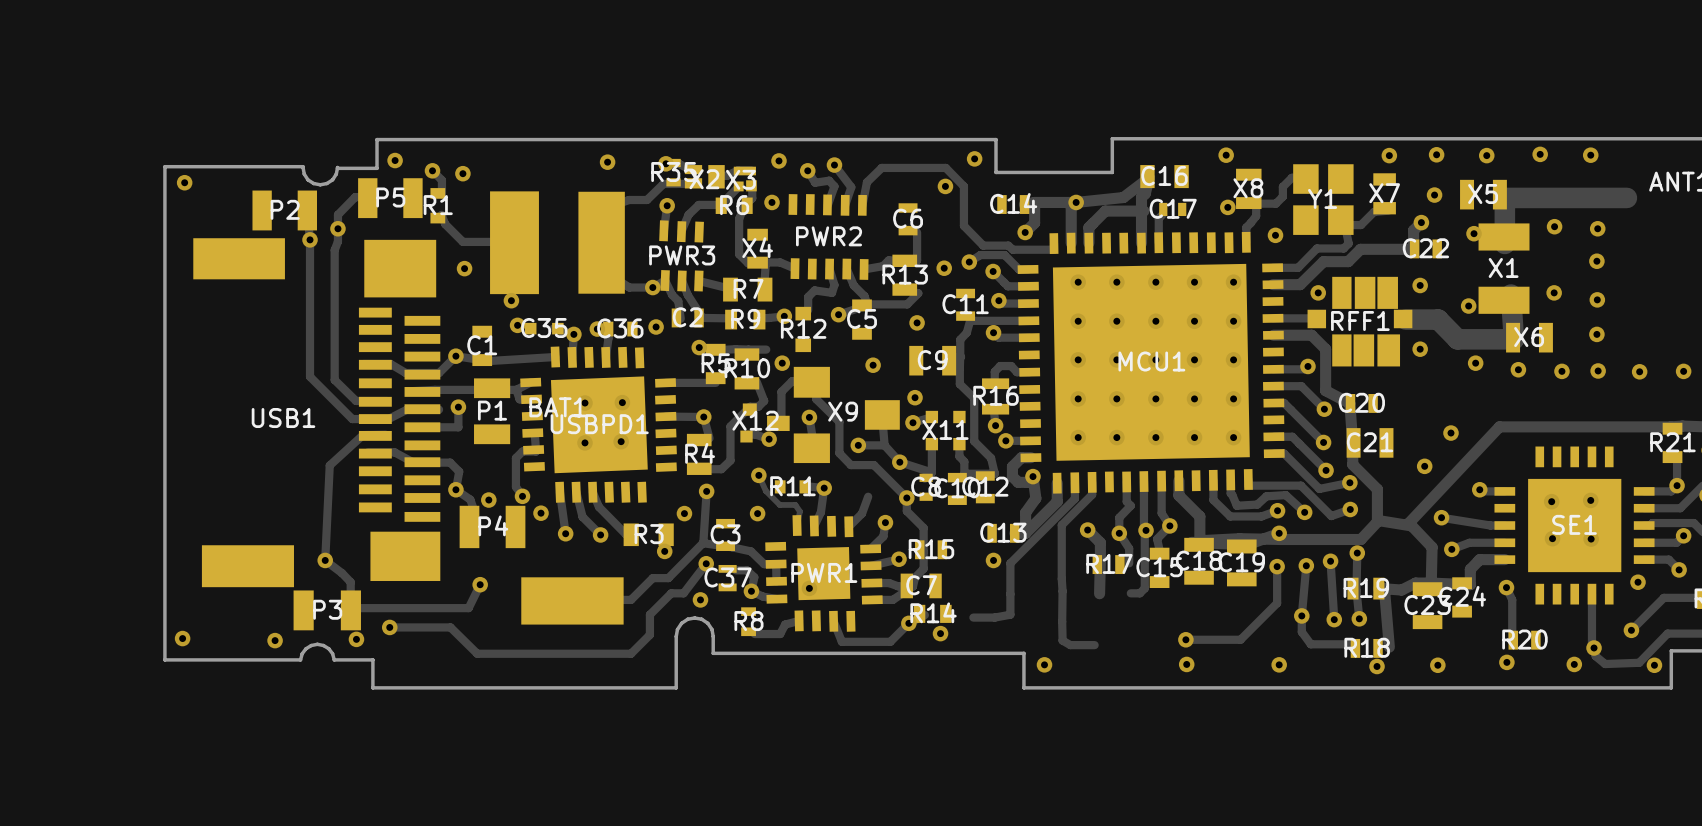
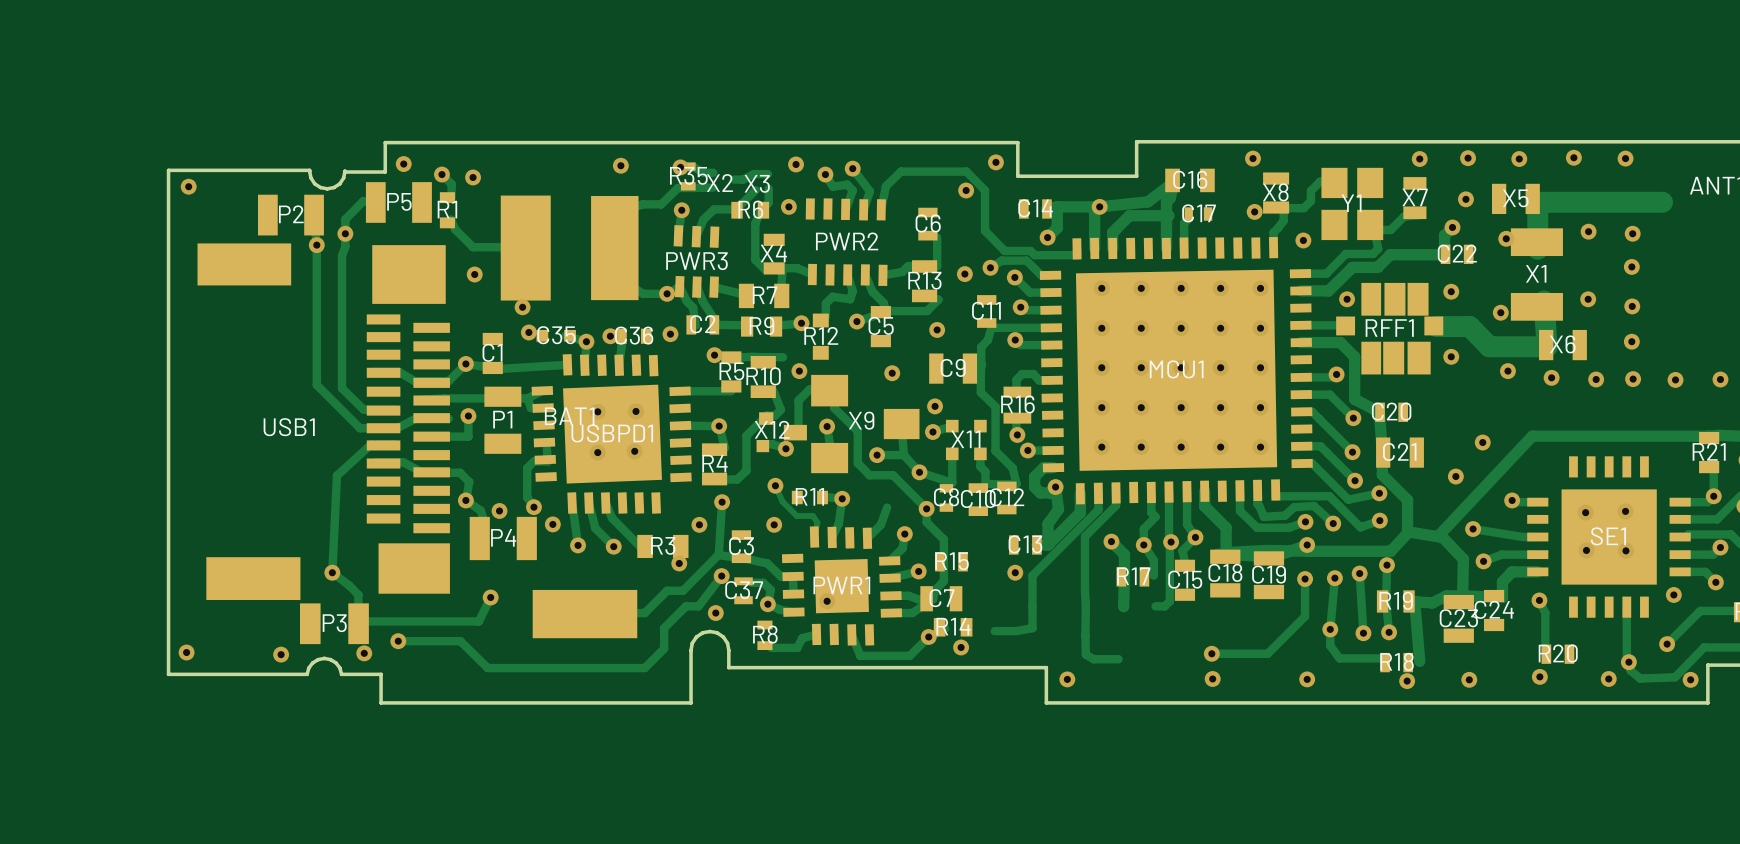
X2 footprint: [684, 165, 725, 189] -> [706, 174, 733, 192]
X3 footprint: [733, 166, 757, 192] -> [744, 174, 770, 193]

